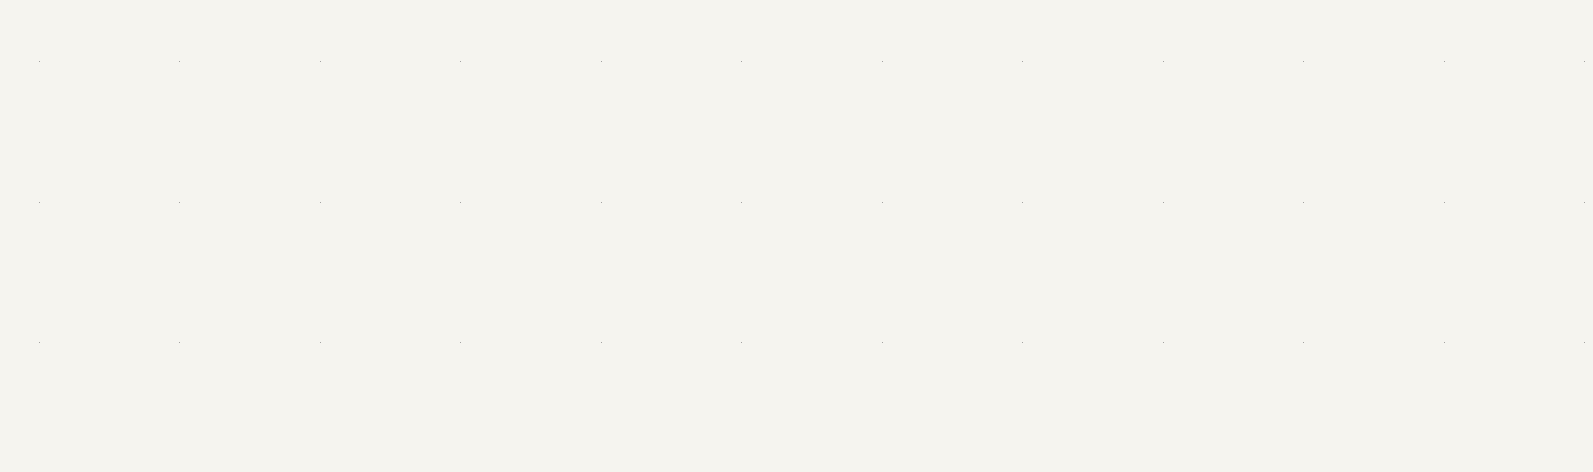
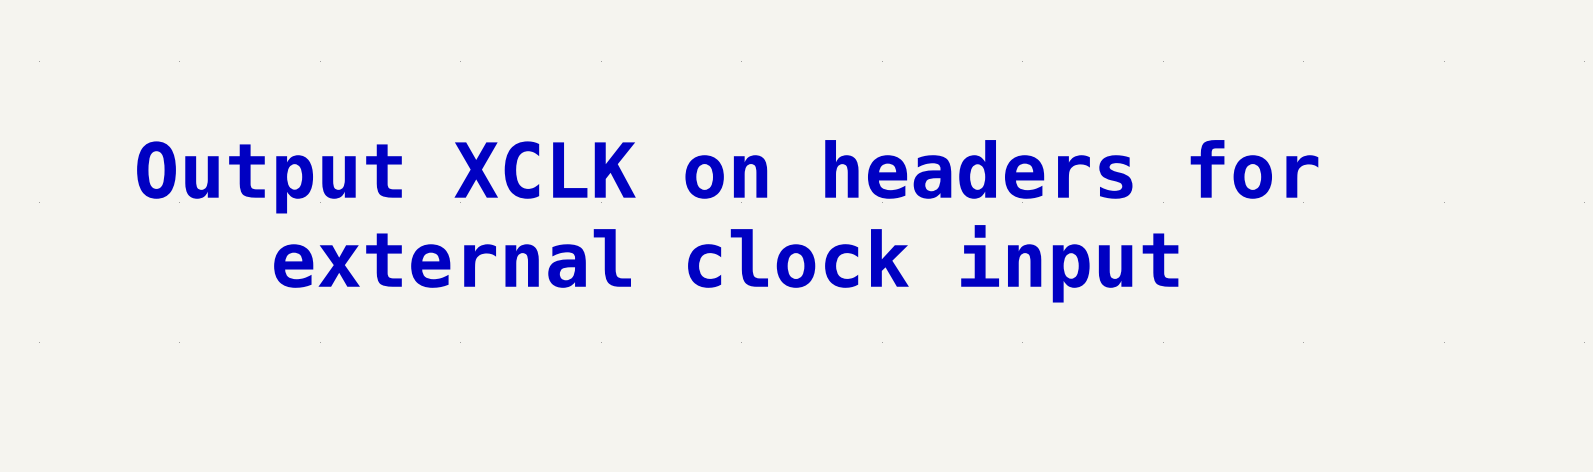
text: none -> Output XCLK on headers for (727, 176)
text: none -> external clock input (726, 263)

